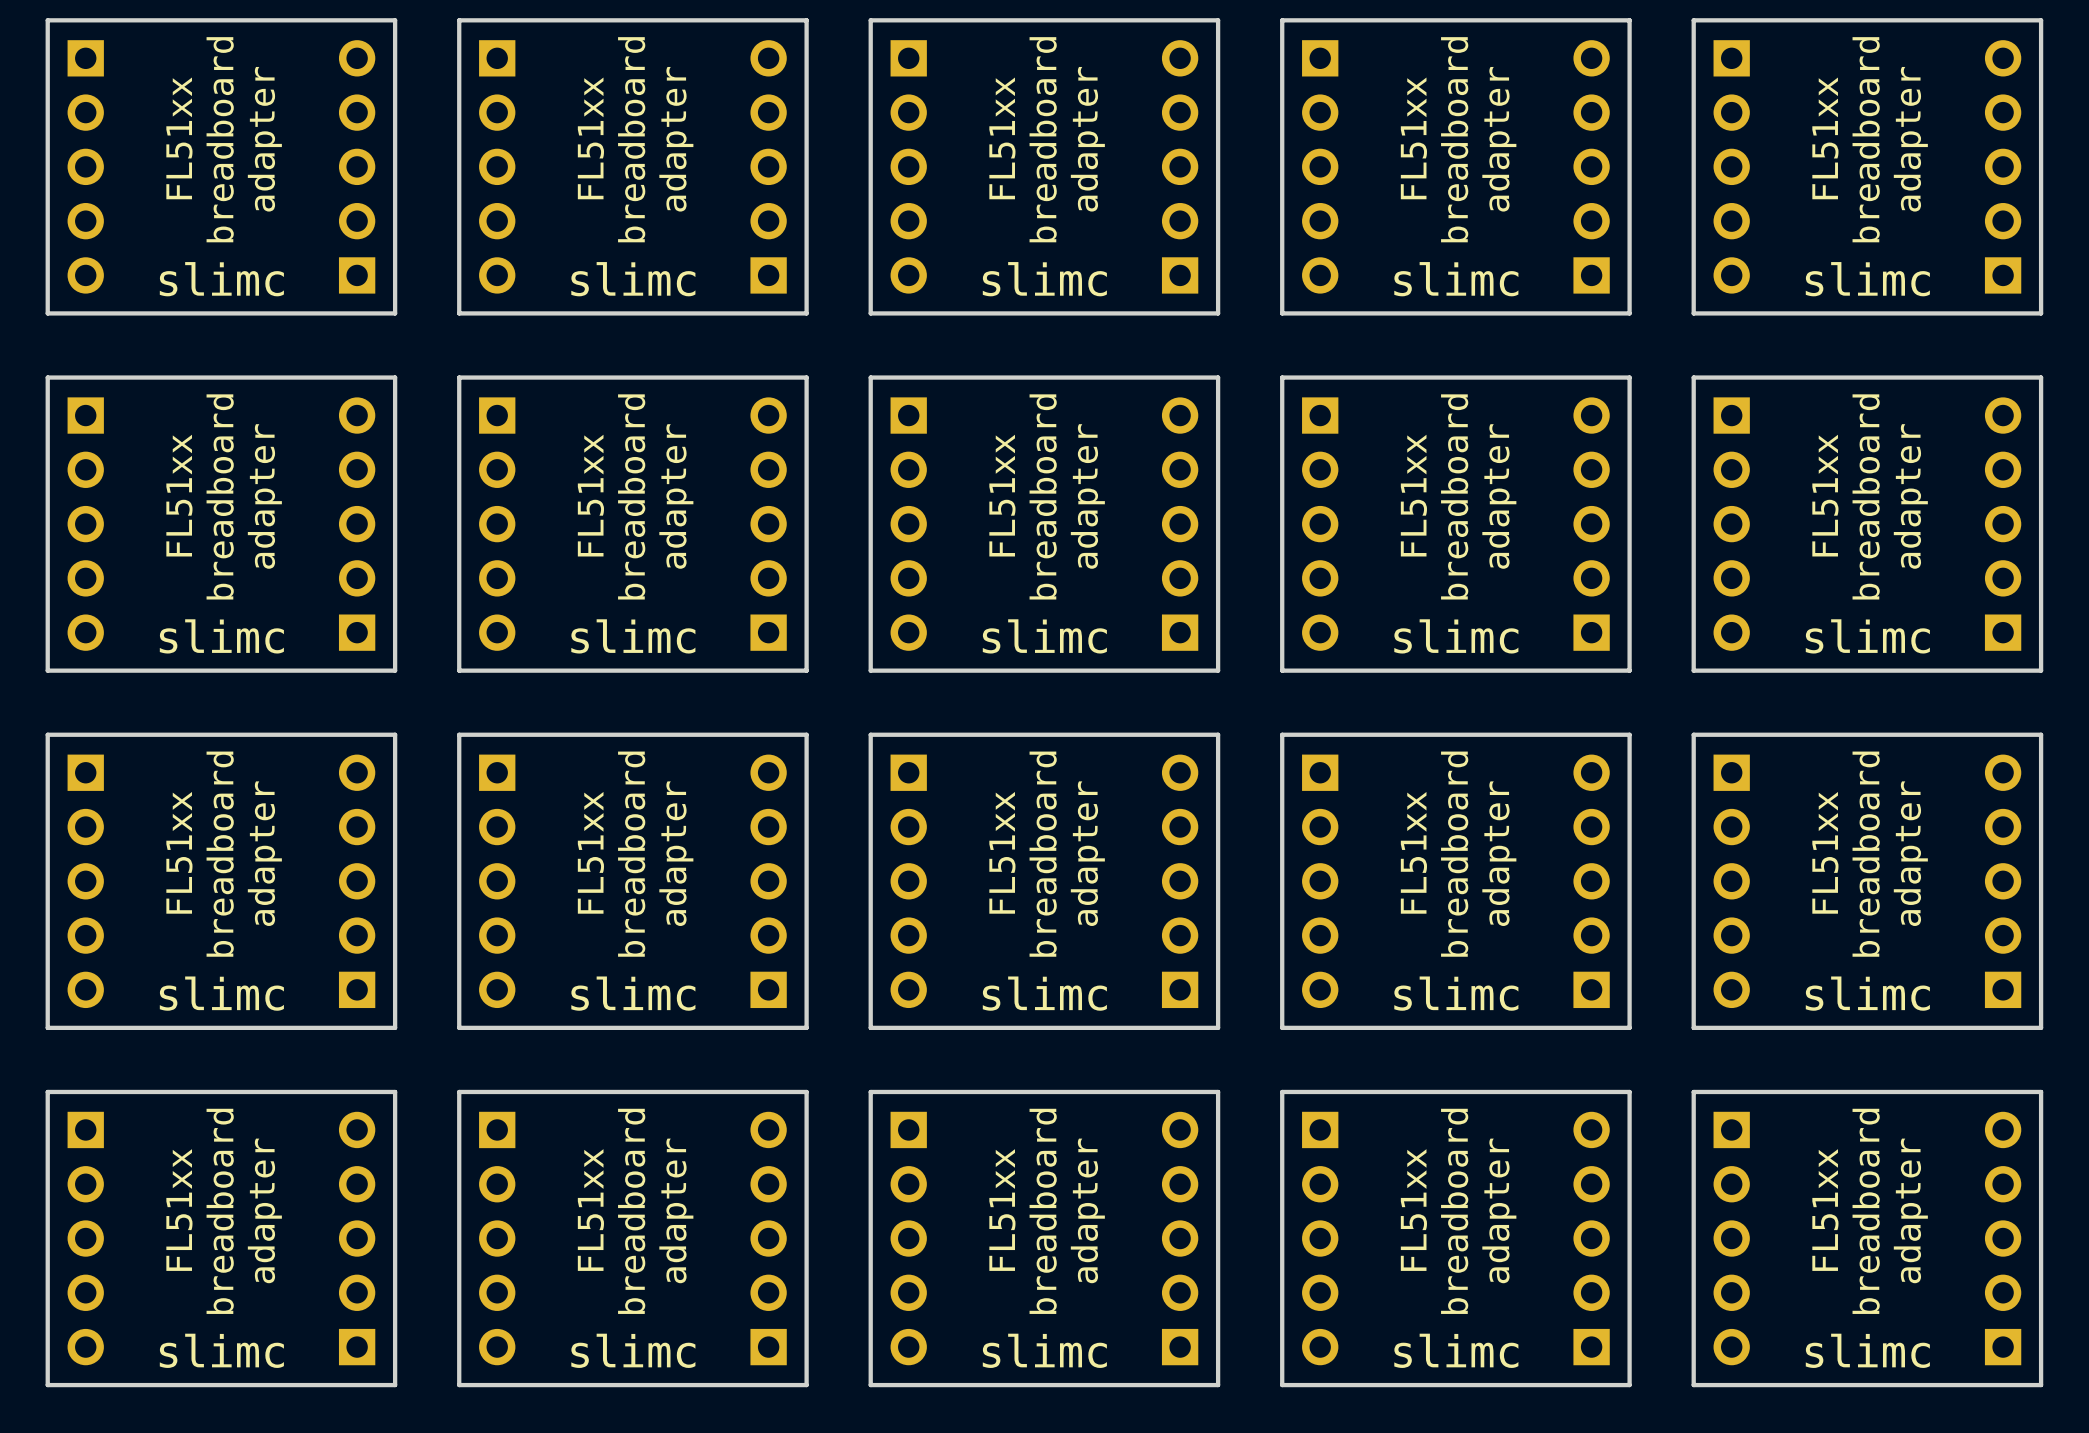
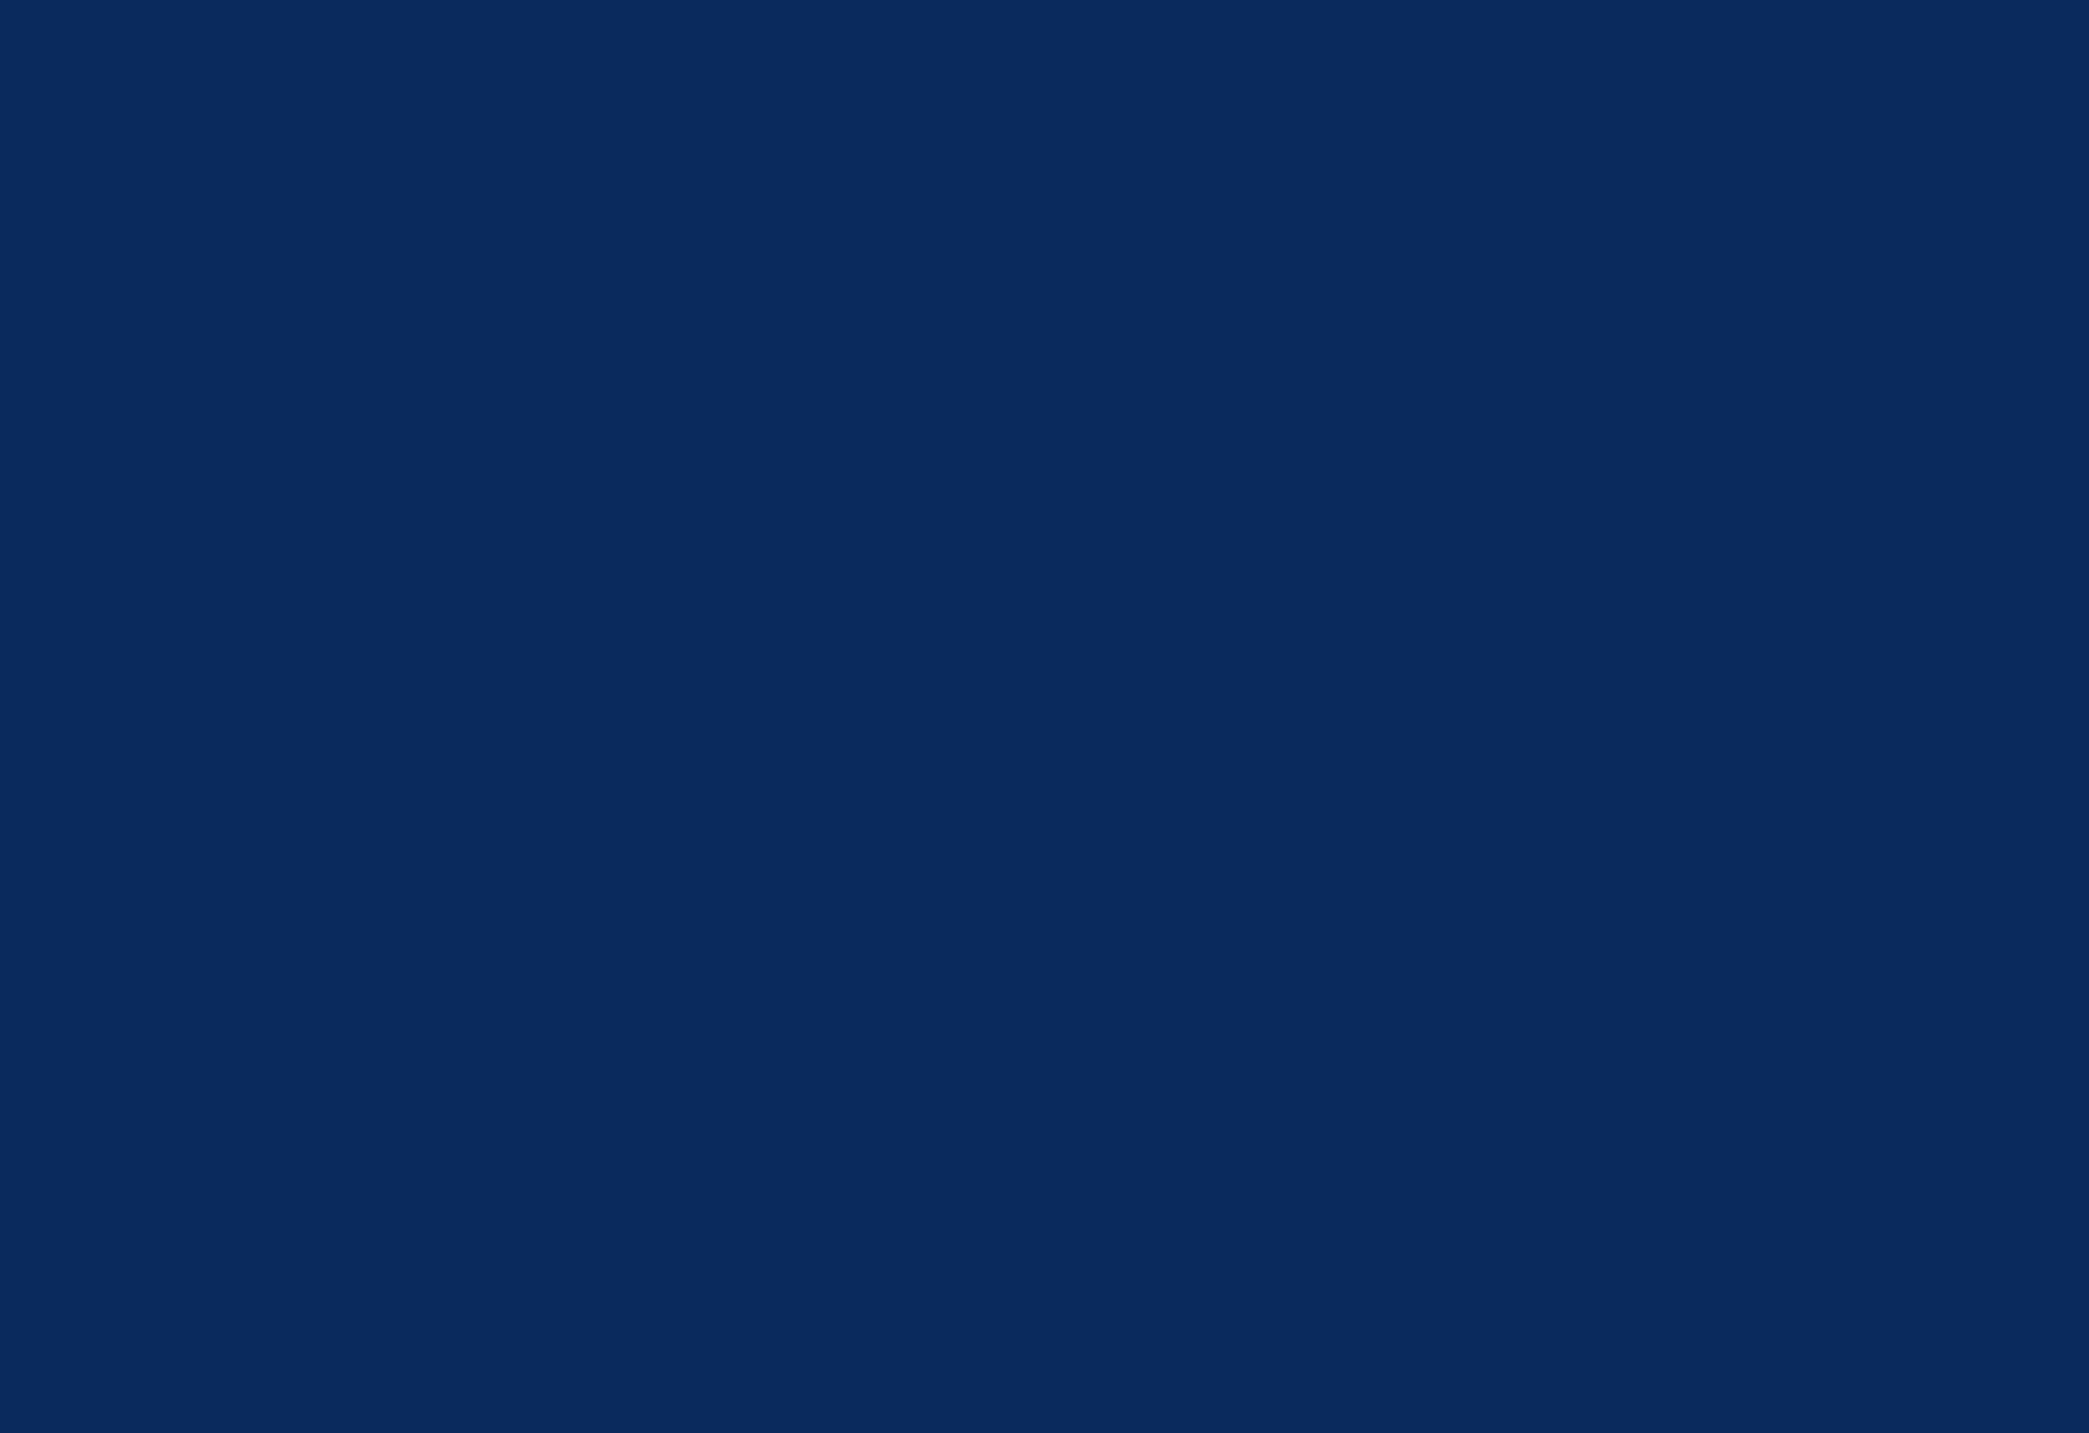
board edge: (395, 20) (395, 313) (47, 313) (47, 20) (395, 20) -> none
board edge: (806, 20) (806, 313) (459, 313) (459, 20) (806, 20) -> none
board edge: (1218, 20) (1218, 313) (870, 313) (870, 20) (1218, 20) -> none
board edge: (1629, 20) (1629, 313) (1282, 313) (1282, 20) (1629, 20) -> none
board edge: (2041, 20) (2041, 313) (1693, 313) (1693, 20) (2041, 20) -> none
text: FL51xx (179, 138) -> none
text: FL51xx (590, 138) -> none
text: FL51xx (1002, 138) -> none
text: FL51xx (1413, 138) -> none
text: FL51xx (1825, 138) -> none
text: breadboard (220, 139) -> none
text: adapter (264, 139) -> none
text: breadboard (631, 139) -> none
text: adapter (676, 139) -> none
text: breadboard (1043, 139) -> none
text: adapter (1087, 139) -> none
text: breadboard (1454, 139) -> none
text: adapter (1499, 139) -> none
text: breadboard (1866, 139) -> none
text: adapter (1910, 139) -> none
part: (85, 166) -> none
part: (357, 166) -> none
part: (497, 166) -> none
part: (768, 166) -> none
part: (908, 166) -> none
part: (1180, 166) -> none
part: (1320, 166) -> none
part: (1591, 166) -> none
part: (1731, 166) -> none
part: (2003, 166) -> none
text: slimc (221, 279) -> none
text: slimc (633, 279) -> none
text: slimc (1044, 279) -> none
text: slimc (1456, 279) -> none
text: slimc (1867, 279) -> none
board edge: (395, 377) (395, 670) (47, 670) (47, 377) (395, 377) -> none
board edge: (806, 377) (806, 670) (459, 670) (459, 377) (806, 377) -> none
board edge: (1218, 377) (1218, 670) (870, 670) (870, 377) (1218, 377) -> none
board edge: (1629, 377) (1629, 670) (1282, 670) (1282, 377) (1629, 377) -> none
board edge: (2041, 377) (2041, 670) (1693, 670) (1693, 377) (2041, 377) -> none
text: FL51xx (179, 495) -> none
text: FL51xx (590, 495) -> none
text: FL51xx (1002, 495) -> none
text: FL51xx (1413, 495) -> none
text: FL51xx (1825, 495) -> none
text: breadboard (220, 496) -> none
text: adapter (264, 496) -> none
text: breadboard (631, 496) -> none
text: adapter (676, 496) -> none
text: breadboard (1043, 496) -> none
text: adapter (1087, 496) -> none
text: breadboard (1454, 496) -> none
text: adapter (1499, 496) -> none
text: breadboard (1866, 496) -> none
text: adapter (1910, 496) -> none
part: (85, 524) -> none
part: (357, 524) -> none
part: (497, 524) -> none
part: (768, 524) -> none
part: (908, 524) -> none
part: (1180, 524) -> none
part: (1320, 524) -> none
part: (1591, 524) -> none
part: (1731, 524) -> none
part: (2003, 524) -> none
text: slimc (221, 636) -> none
text: slimc (633, 636) -> none
text: slimc (1044, 636) -> none
text: slimc (1456, 636) -> none
text: slimc (1867, 636) -> none
board edge: (395, 734) (395, 1027) (47, 1027) (47, 734) (395, 734) -> none
board edge: (806, 734) (806, 1027) (459, 1027) (459, 734) (806, 734) -> none
board edge: (1218, 734) (1218, 1027) (870, 1027) (870, 734) (1218, 734) -> none
board edge: (1629, 734) (1629, 1027) (1282, 1027) (1282, 734) (1629, 734) -> none
board edge: (2041, 734) (2041, 1027) (1693, 1027) (1693, 734) (2041, 734) -> none
text: FL51xx (179, 852) -> none
text: FL51xx (590, 852) -> none
text: FL51xx (1002, 852) -> none
text: FL51xx (1413, 852) -> none
text: FL51xx (1825, 852) -> none
text: adapter (264, 853) -> none
text: adapter (676, 853) -> none
text: adapter (1087, 853) -> none
text: adapter (1499, 853) -> none
text: adapter (1910, 853) -> none
text: breadboard (220, 854) -> none
text: breadboard (631, 854) -> none
text: breadboard (1043, 854) -> none
text: breadboard (1454, 854) -> none
text: breadboard (1866, 854) -> none
part: (85, 881) -> none
part: (357, 881) -> none
part: (497, 881) -> none
part: (768, 881) -> none
part: (908, 881) -> none
part: (1180, 881) -> none
part: (1320, 881) -> none
part: (1591, 881) -> none
part: (1731, 881) -> none
part: (2003, 881) -> none
text: slimc (221, 993) -> none
text: slimc (633, 993) -> none
text: slimc (1044, 993) -> none
text: slimc (1456, 993) -> none
text: slimc (1867, 993) -> none
board edge: (395, 1091) (395, 1385) (47, 1385) (47, 1091) (395, 1091) -> none
board edge: (806, 1091) (806, 1385) (459, 1385) (459, 1091) (806, 1091) -> none
board edge: (1218, 1091) (1218, 1385) (870, 1385) (870, 1091) (1218, 1091) -> none
board edge: (1629, 1091) (1629, 1385) (1282, 1385) (1282, 1091) (1629, 1091) -> none
board edge: (2041, 1091) (2041, 1385) (1693, 1385) (1693, 1091) (2041, 1091) -> none
text: FL51xx (179, 1210) -> none
text: adapter (264, 1210) -> none
text: FL51xx (590, 1210) -> none
text: adapter (676, 1210) -> none
text: FL51xx (1002, 1210) -> none
text: adapter (1087, 1210) -> none
text: FL51xx (1413, 1210) -> none
text: adapter (1499, 1210) -> none
text: FL51xx (1825, 1210) -> none
text: adapter (1910, 1210) -> none
text: breadboard (220, 1211) -> none
text: breadboard (631, 1211) -> none
text: breadboard (1043, 1211) -> none
text: breadboard (1454, 1211) -> none
text: breadboard (1866, 1211) -> none
part: (85, 1238) -> none
part: (357, 1238) -> none
part: (497, 1238) -> none
part: (768, 1238) -> none
part: (908, 1238) -> none
part: (1180, 1238) -> none
part: (1320, 1238) -> none
part: (1591, 1238) -> none
part: (1731, 1238) -> none
part: (2003, 1238) -> none
text: slimc (221, 1350) -> none
text: slimc (633, 1350) -> none
text: slimc (1044, 1350) -> none
text: slimc (1456, 1350) -> none
text: slimc (1867, 1350) -> none

